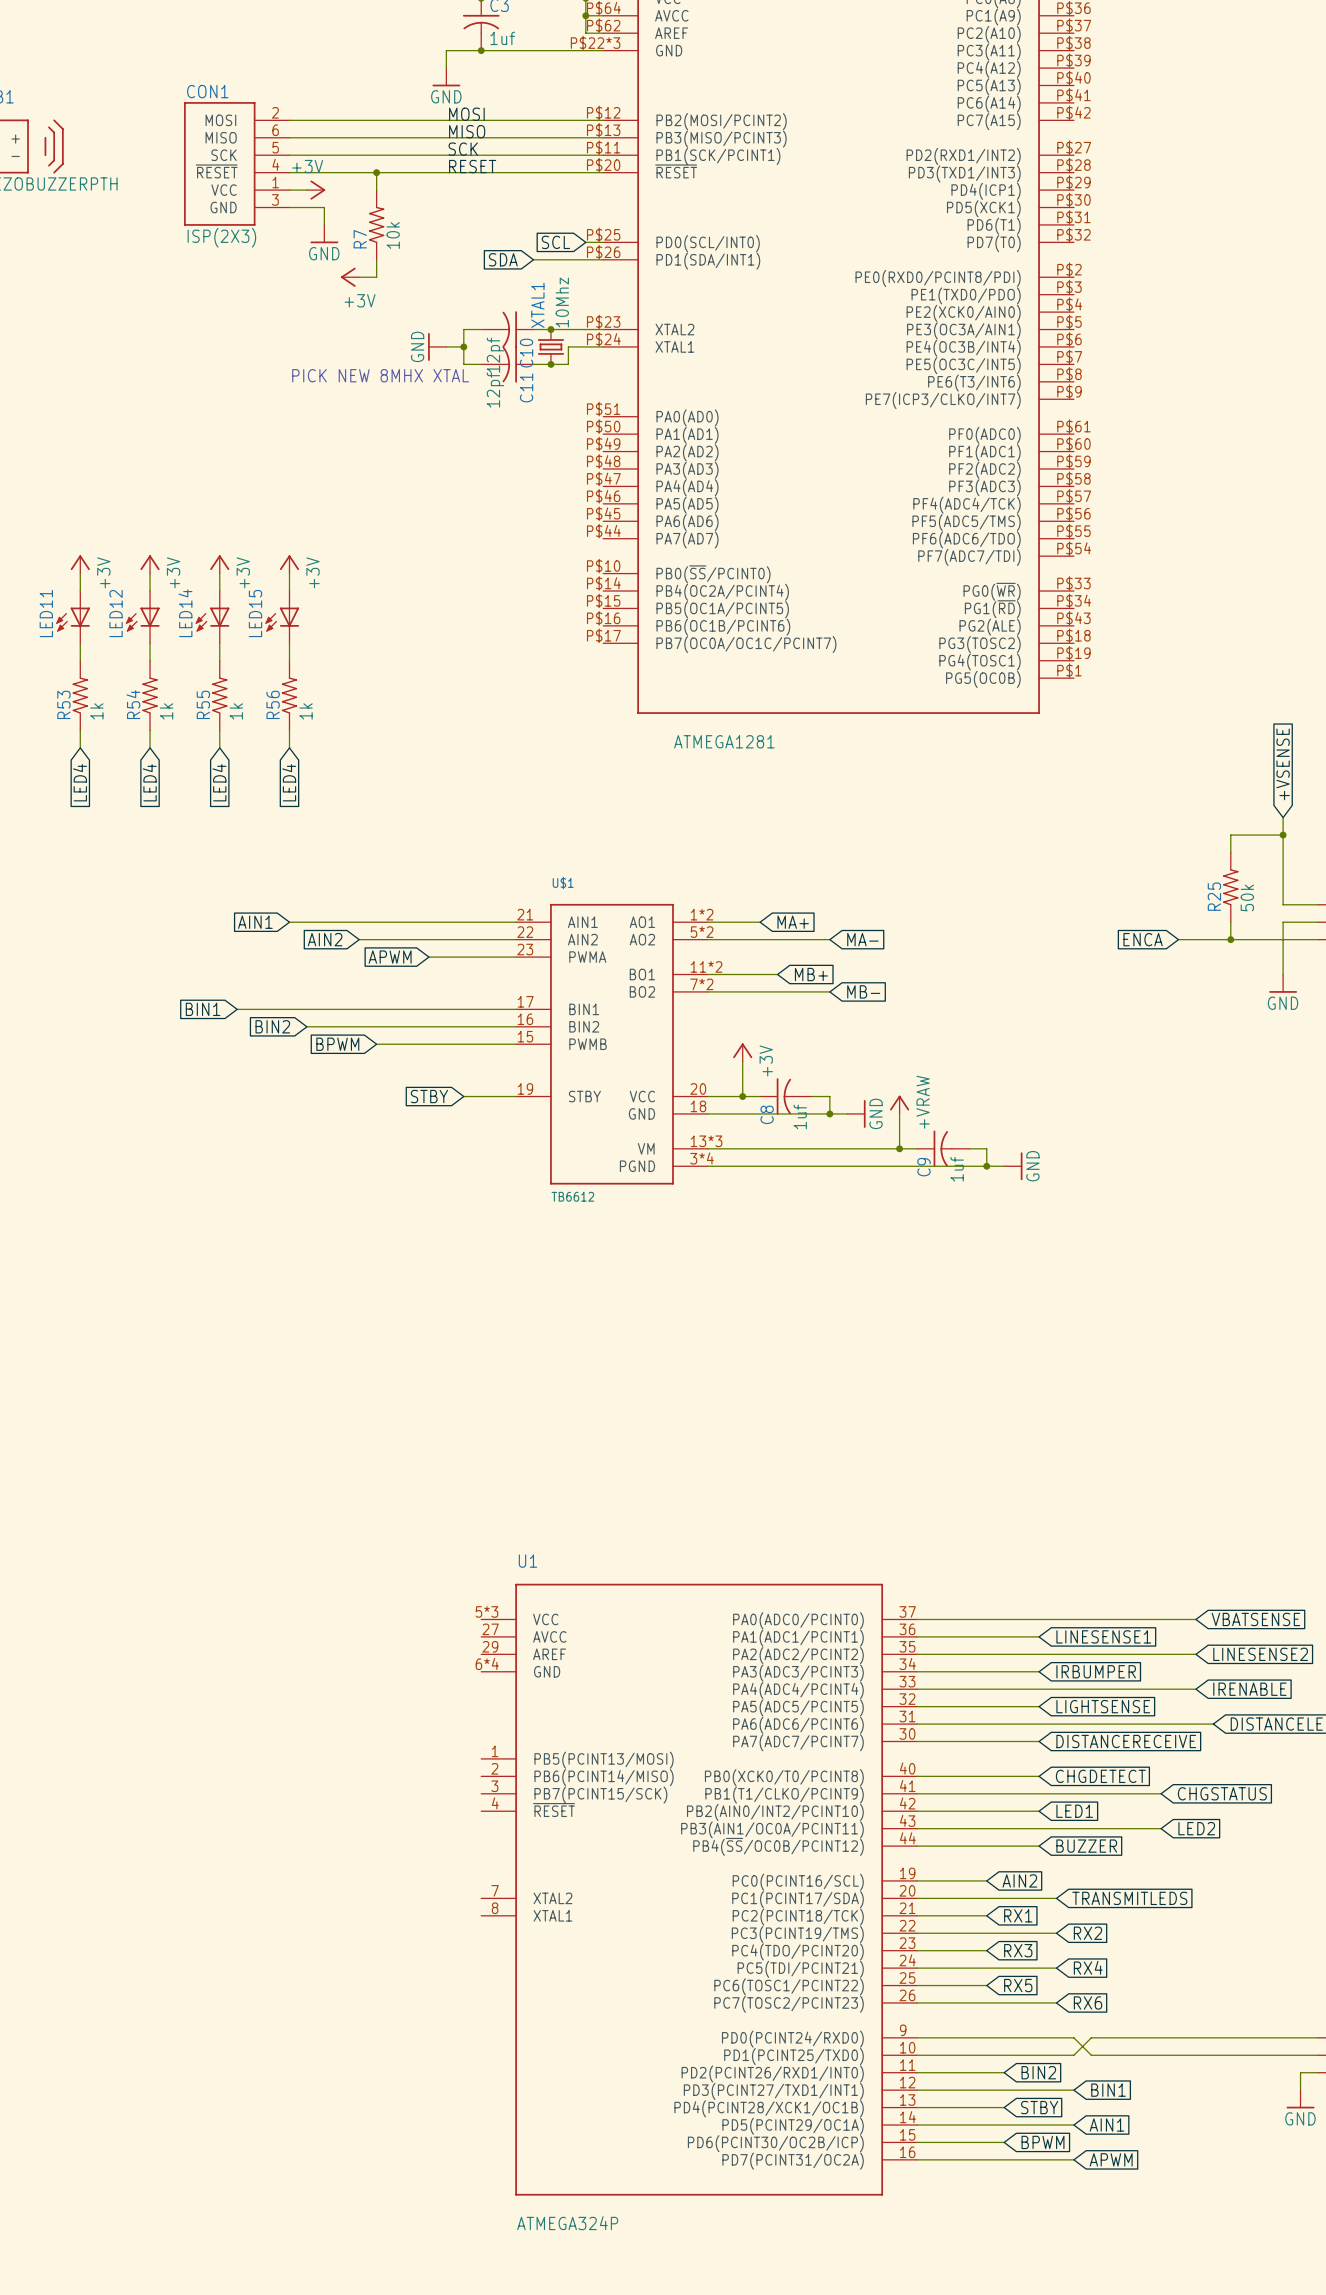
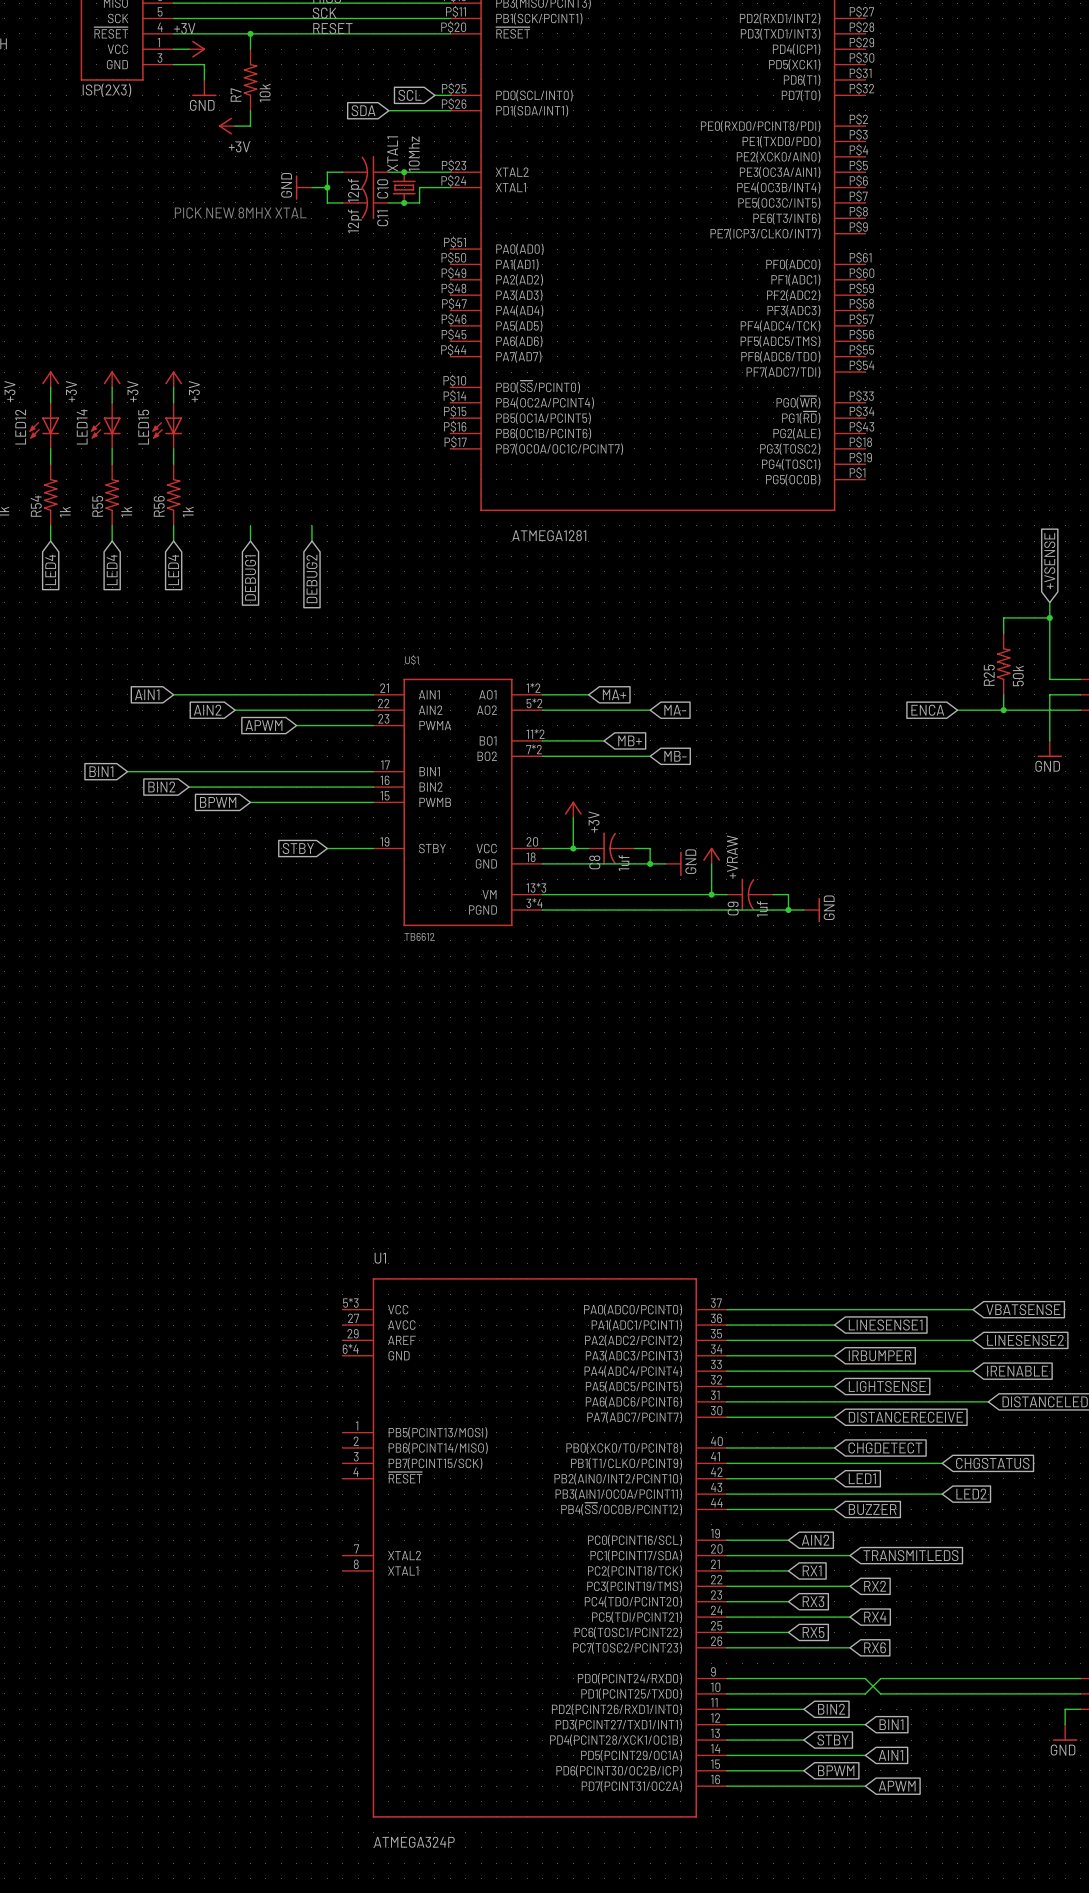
wire: none -> (250, 525) (250, 541)
wire: none -> (311, 525) (311, 541)
global label: none -> DEBUG1 (250, 577)
global label: none -> DEBUG2 (311, 578)

